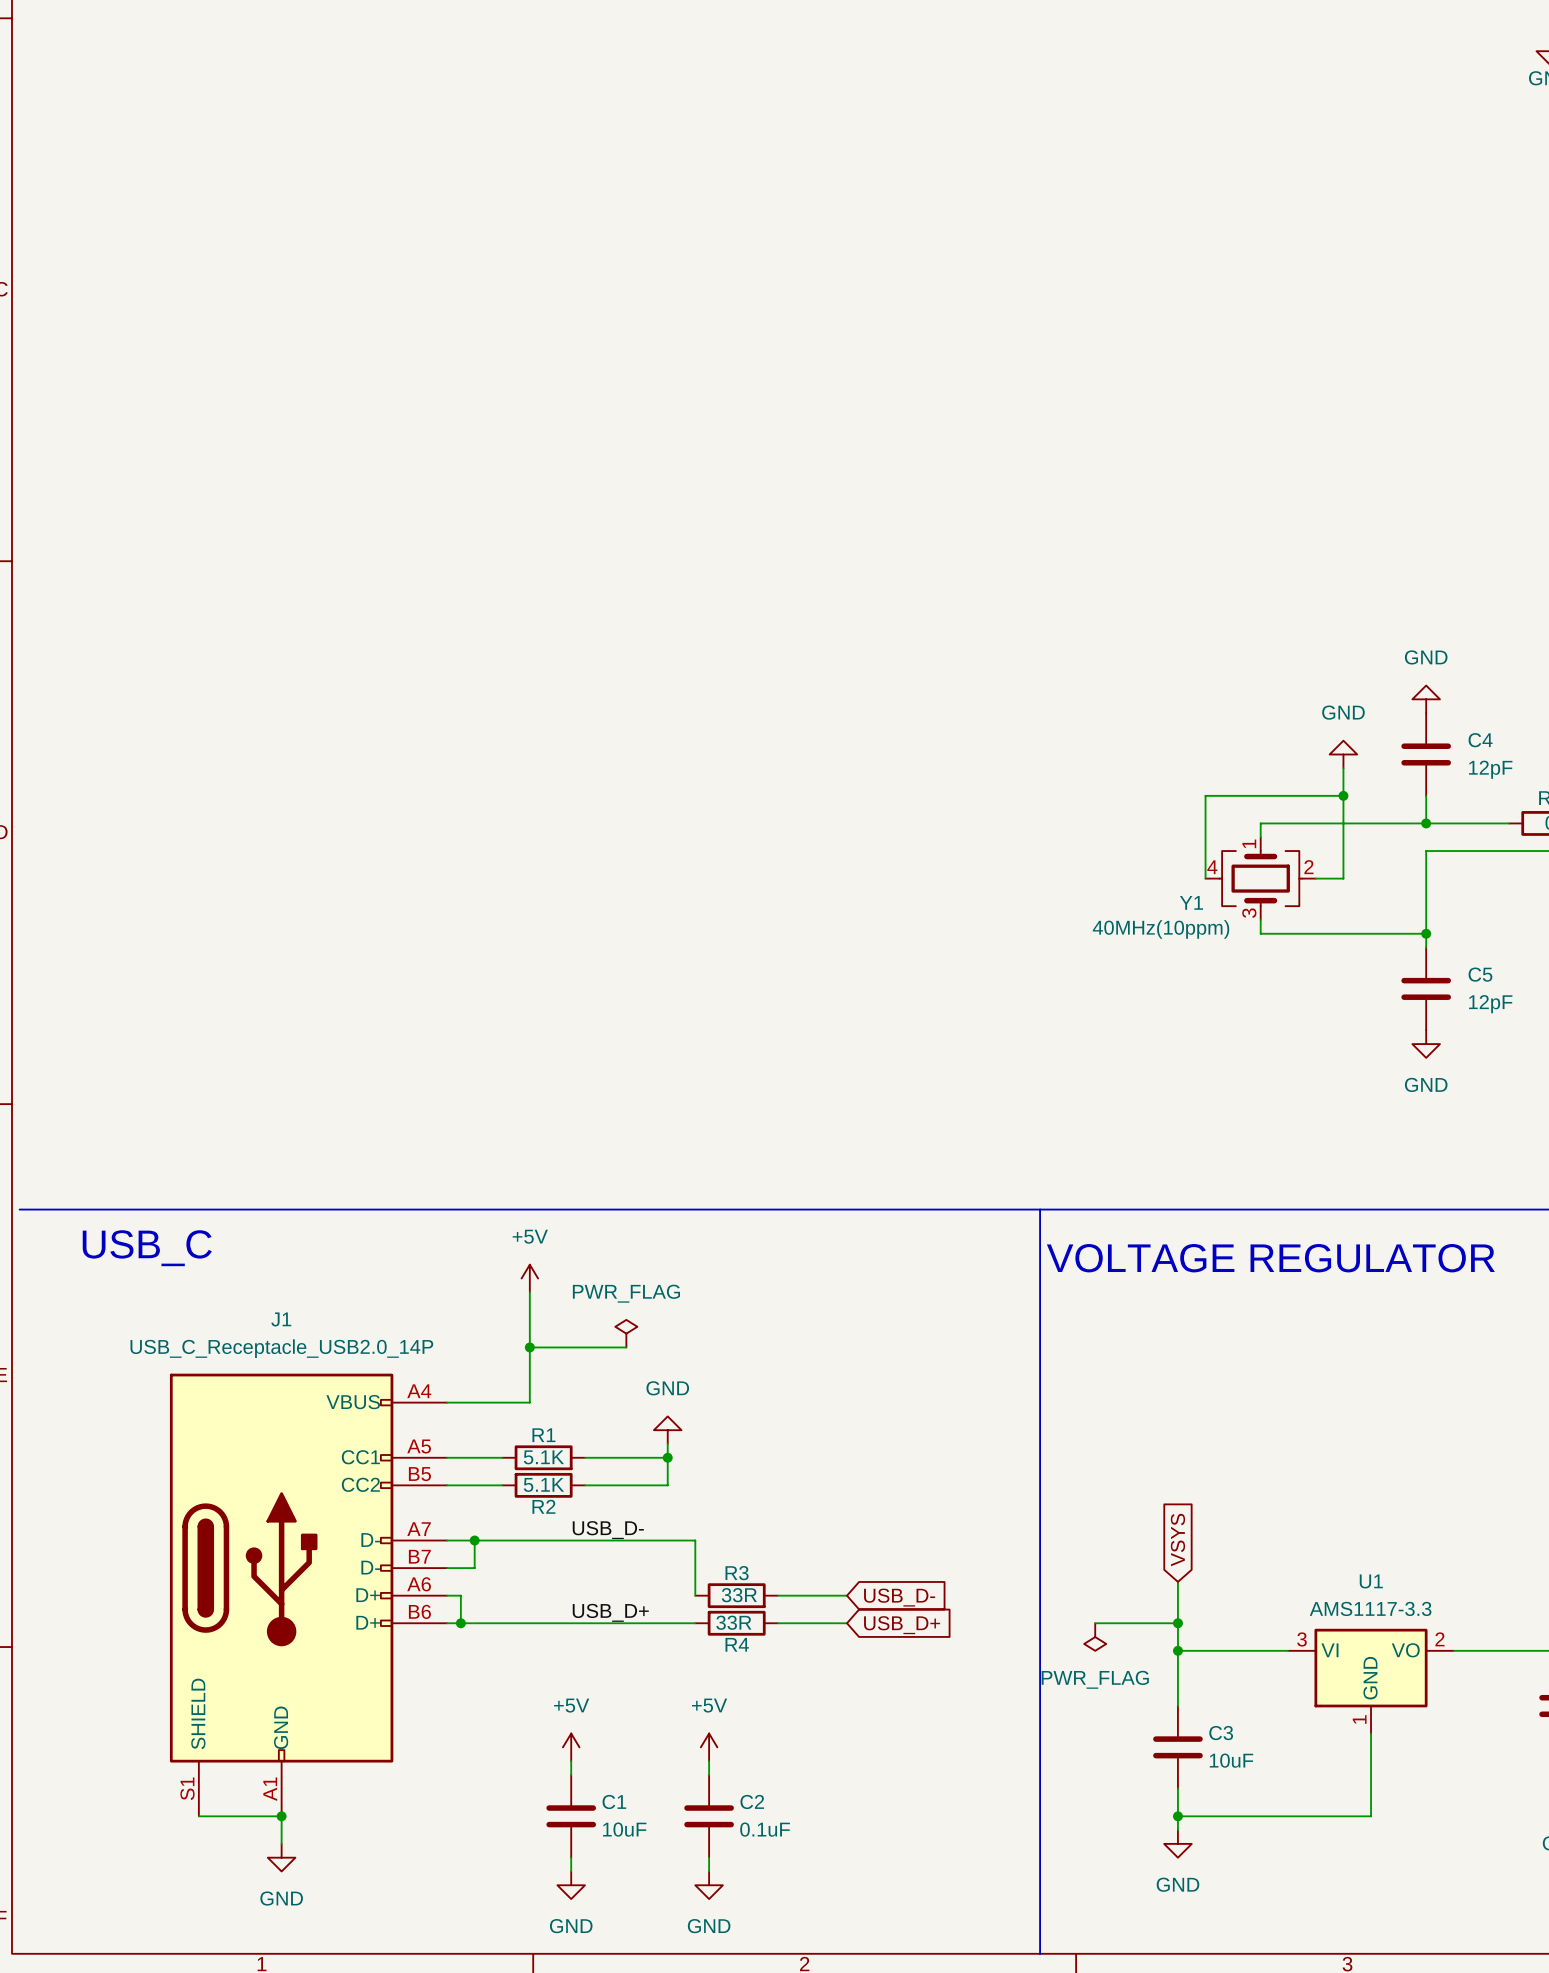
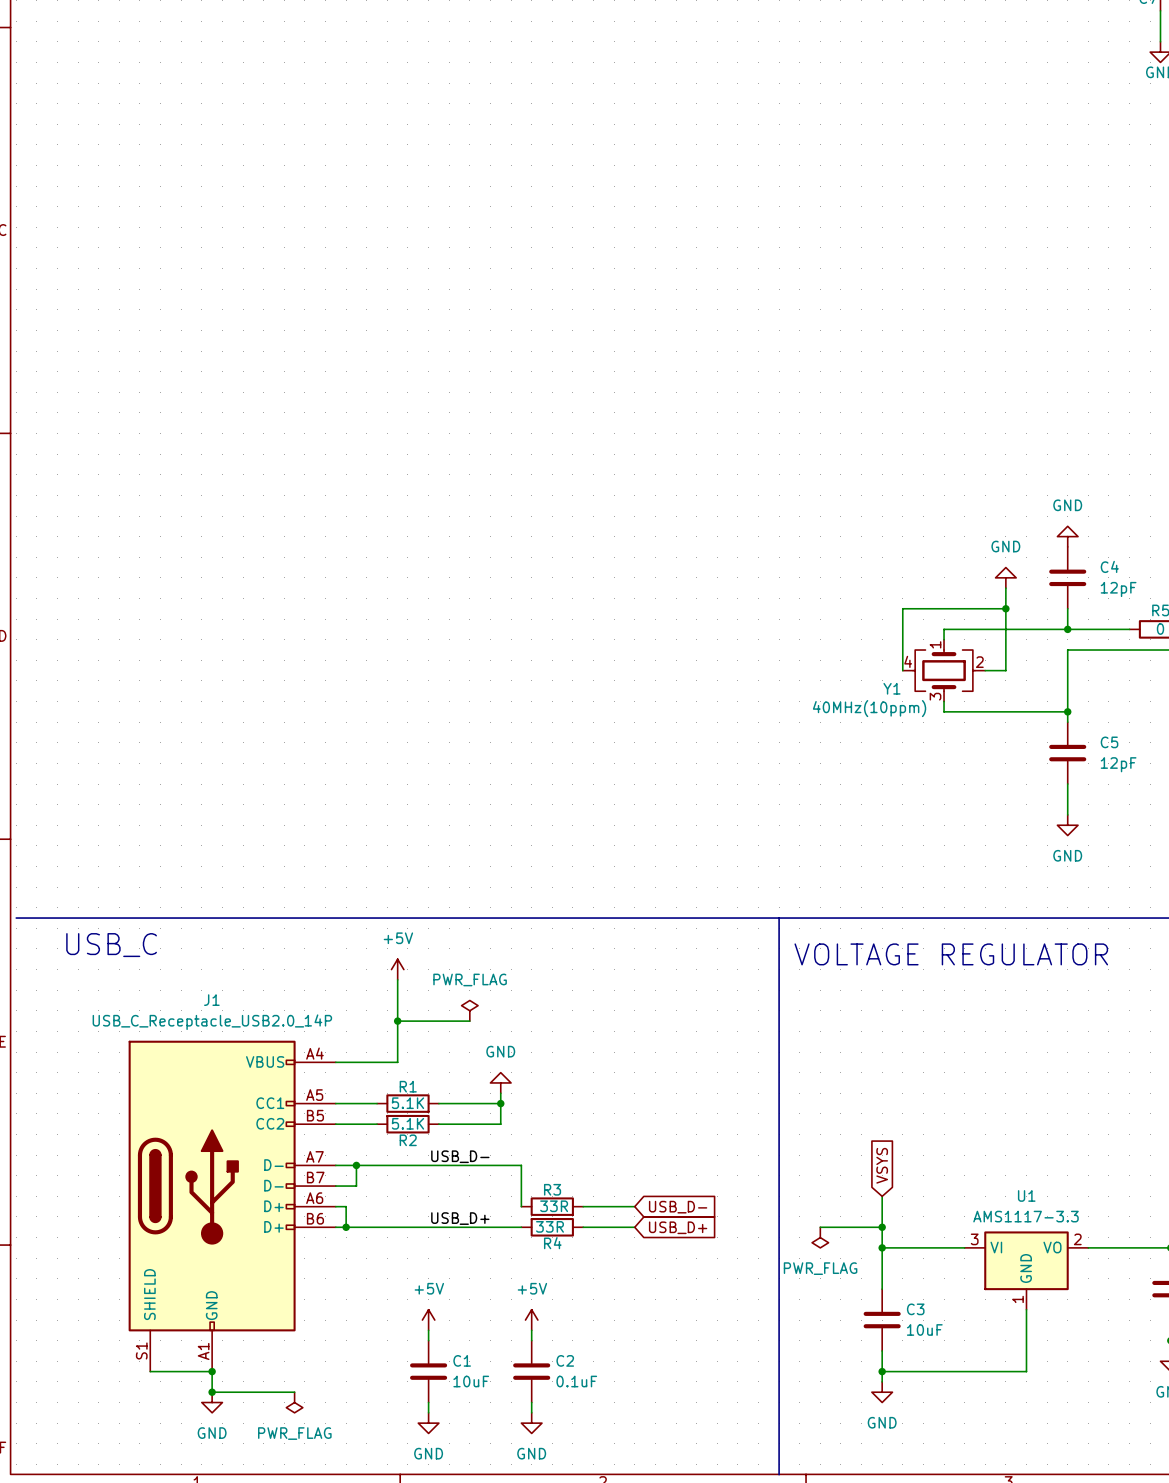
wire: none -> (1067, 784) (1067, 814)
power symbol position: GND (1426, 1044) -> GND (1067, 825)
wire: none -> (212, 1392) (294, 1392)
junction: none -> (212, 1392)
power symbol: none -> PWR_FLAG (294, 1402)

